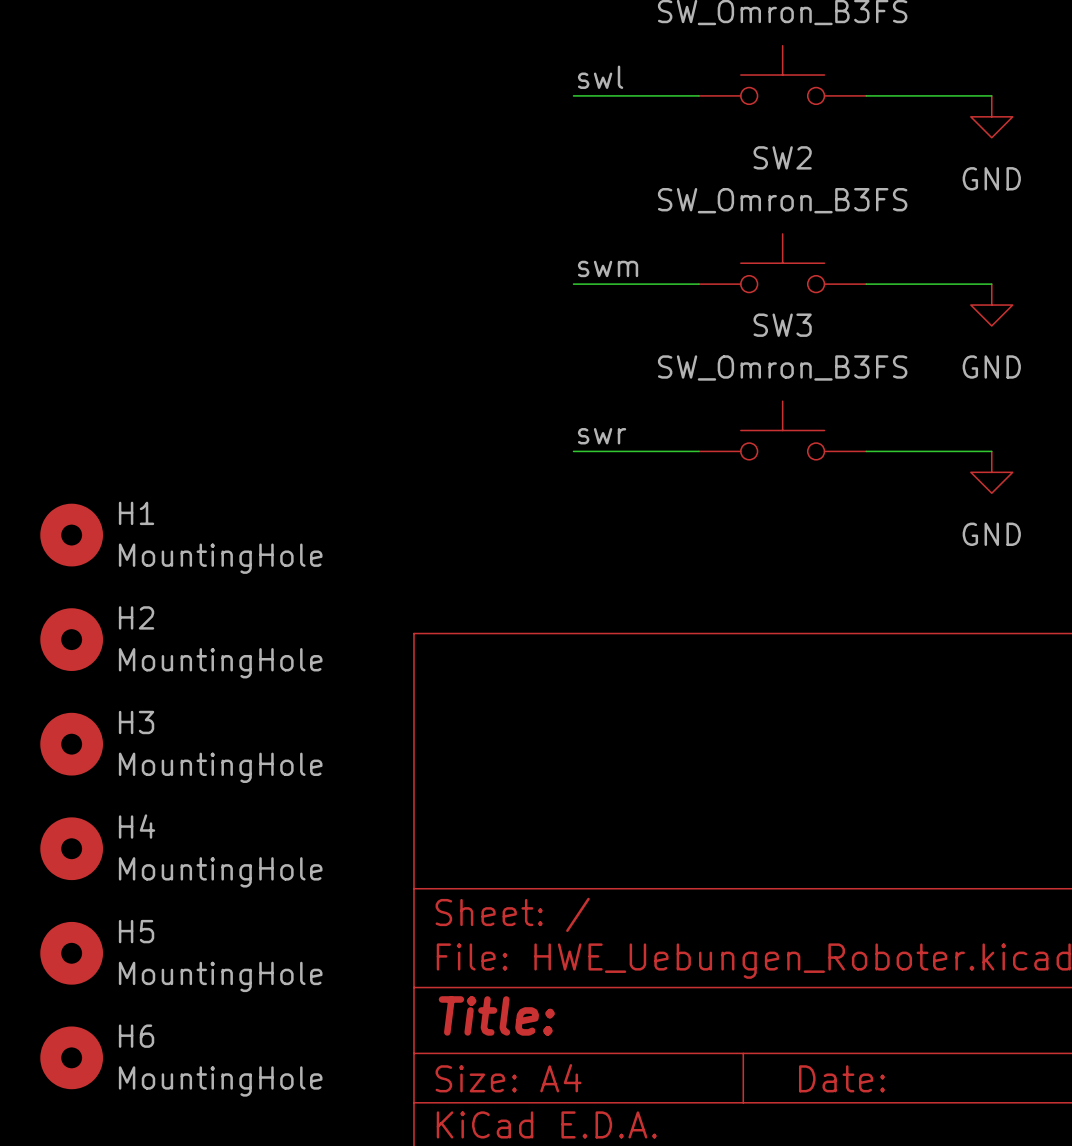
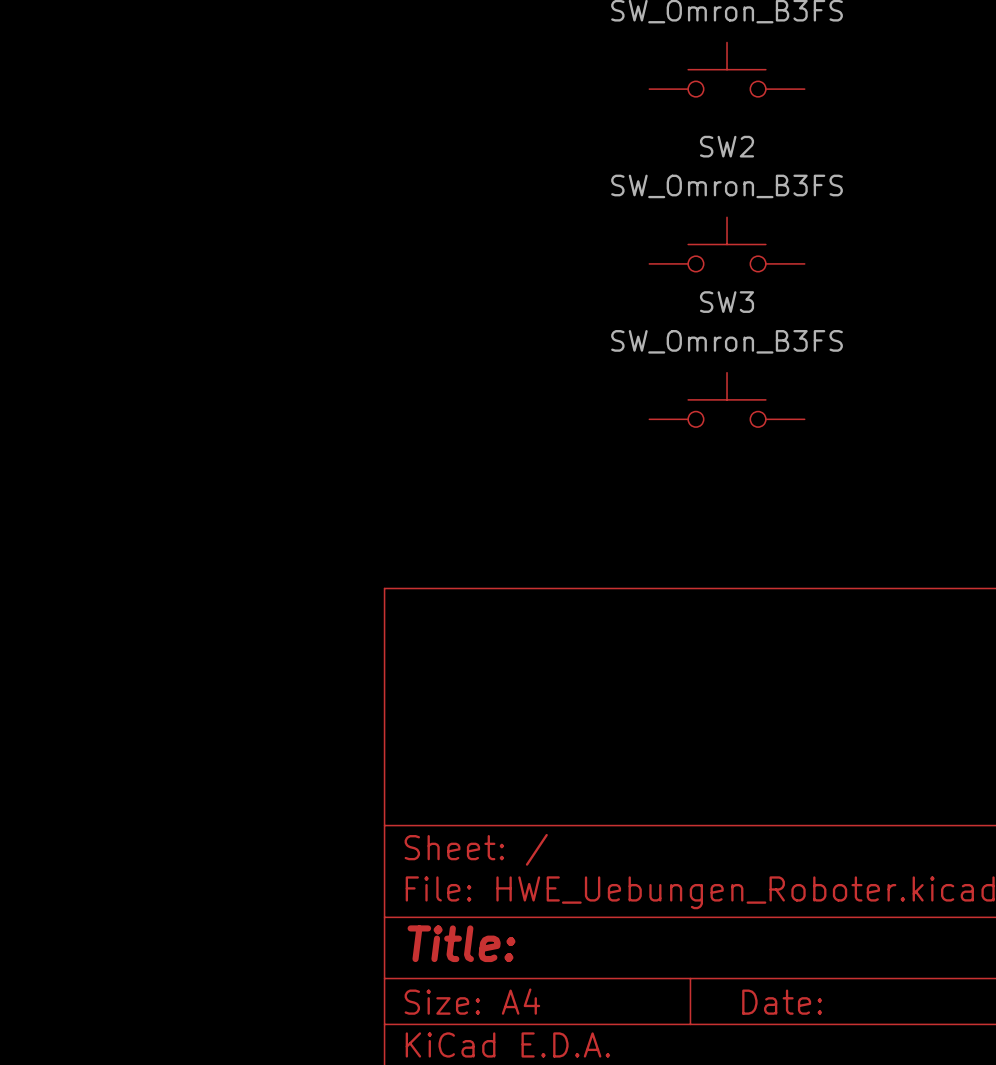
label: swl (600, 77) -> none
wire: (573, 95) (699, 95) -> none
wire: (866, 95) (991, 95) -> none
power symbol: GND (991, 116) -> none
label: swm (608, 268) -> none
wire: (573, 284) (699, 284) -> none
wire: (866, 284) (991, 284) -> none
power symbol: GND (991, 305) -> none
label: swr (602, 436) -> none
wire: (573, 451) (699, 451) -> none
wire: (866, 451) (991, 451) -> none
power symbol: GND (991, 472) -> none
H1: MountingHole (71, 535) -> none
H2: MountingHole (71, 639) -> none
H3: MountingHole (71, 744) -> none
H4: MountingHole (71, 848) -> none
H5: MountingHole (71, 953) -> none
H6: MountingHole (71, 1057) -> none

